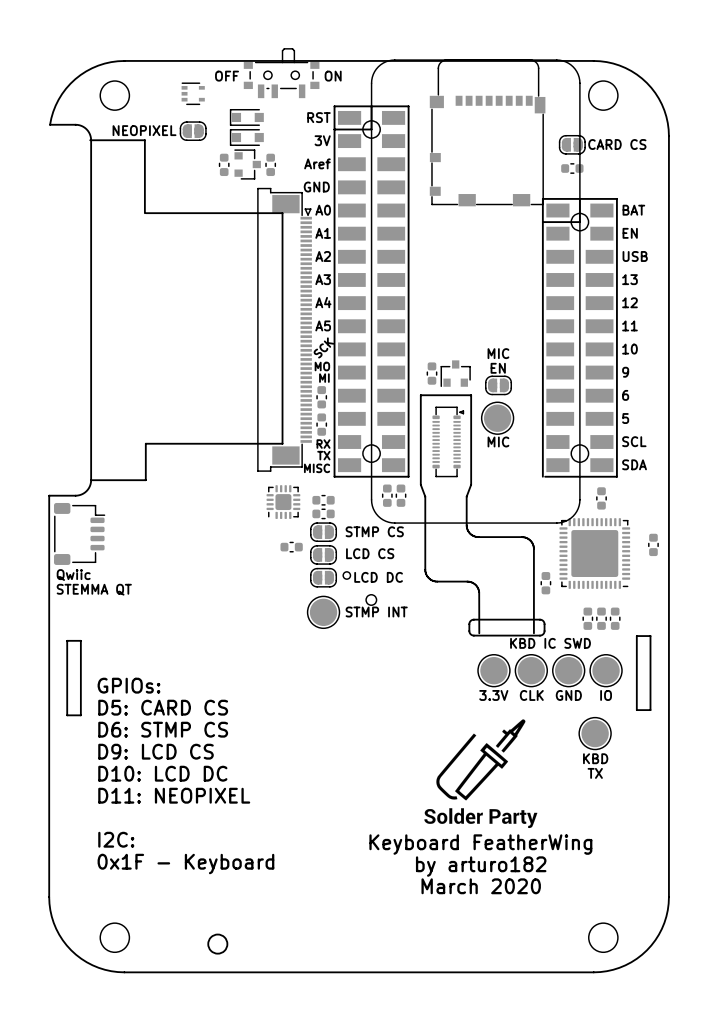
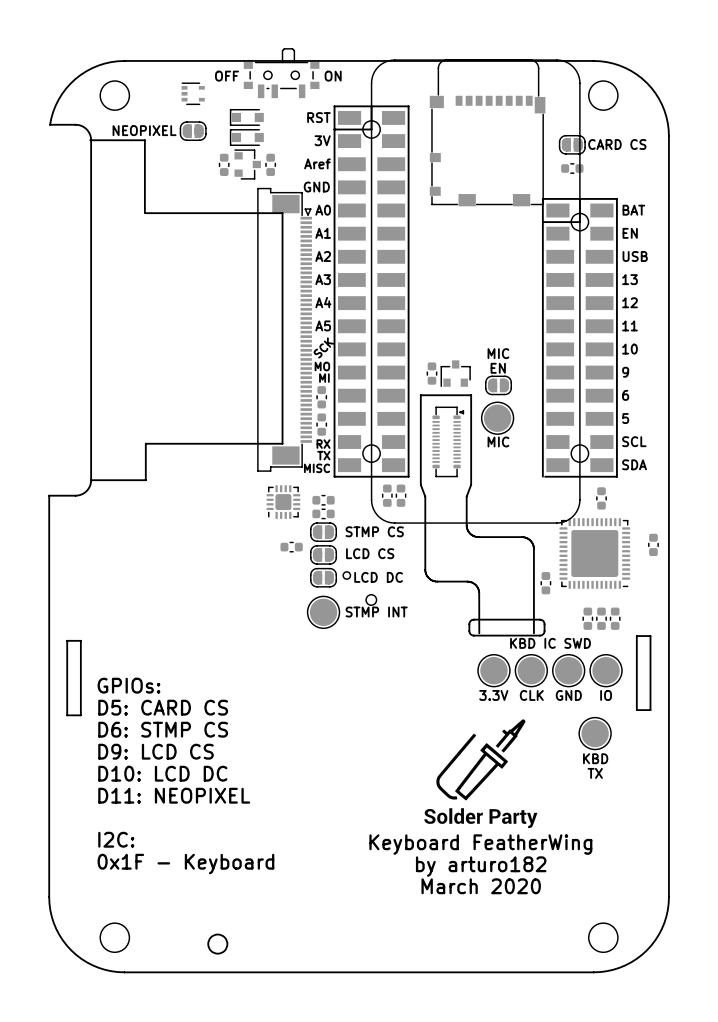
part: (79, 533) -> none
text: Qwiic (73, 575) -> none
text: STEMMA QT (94, 589) -> none

